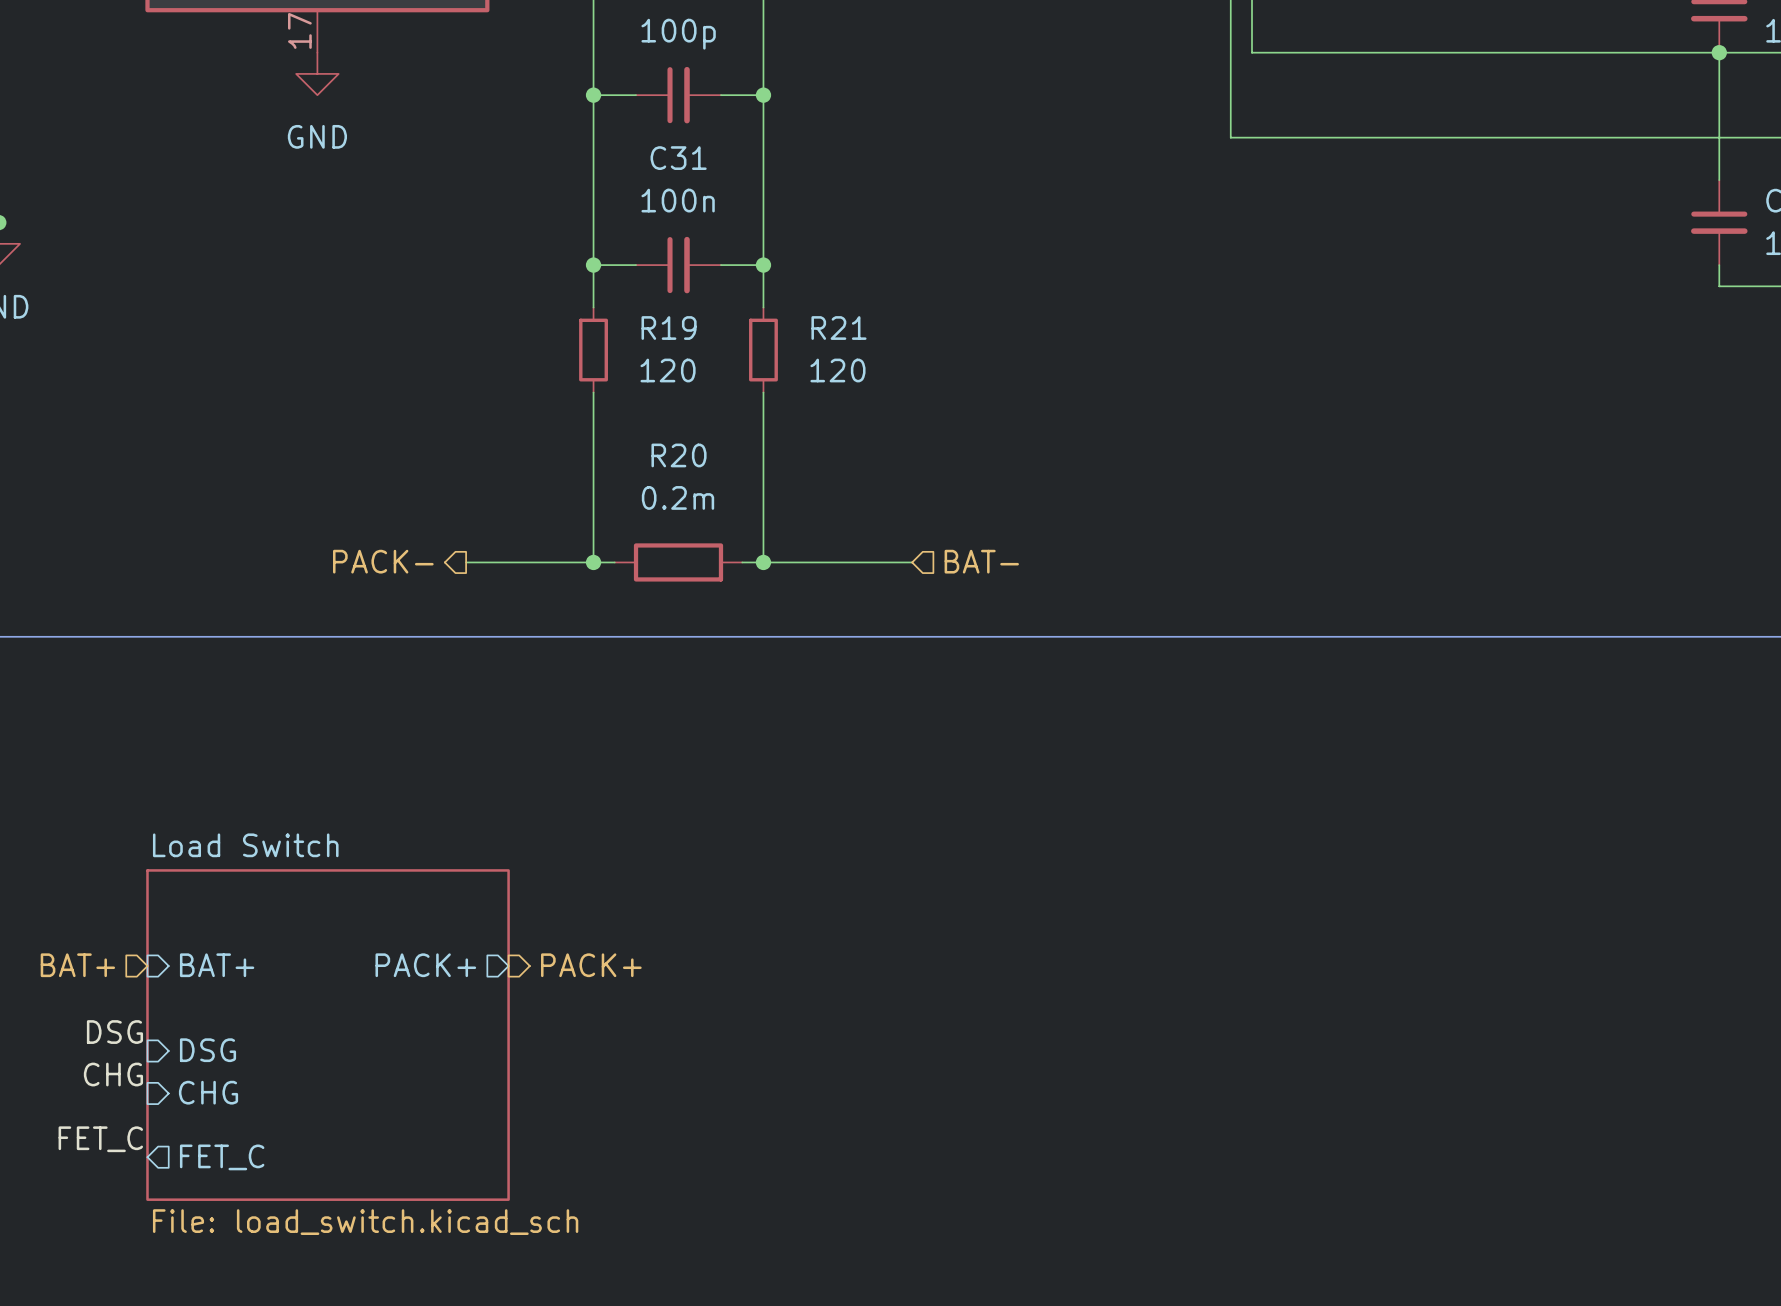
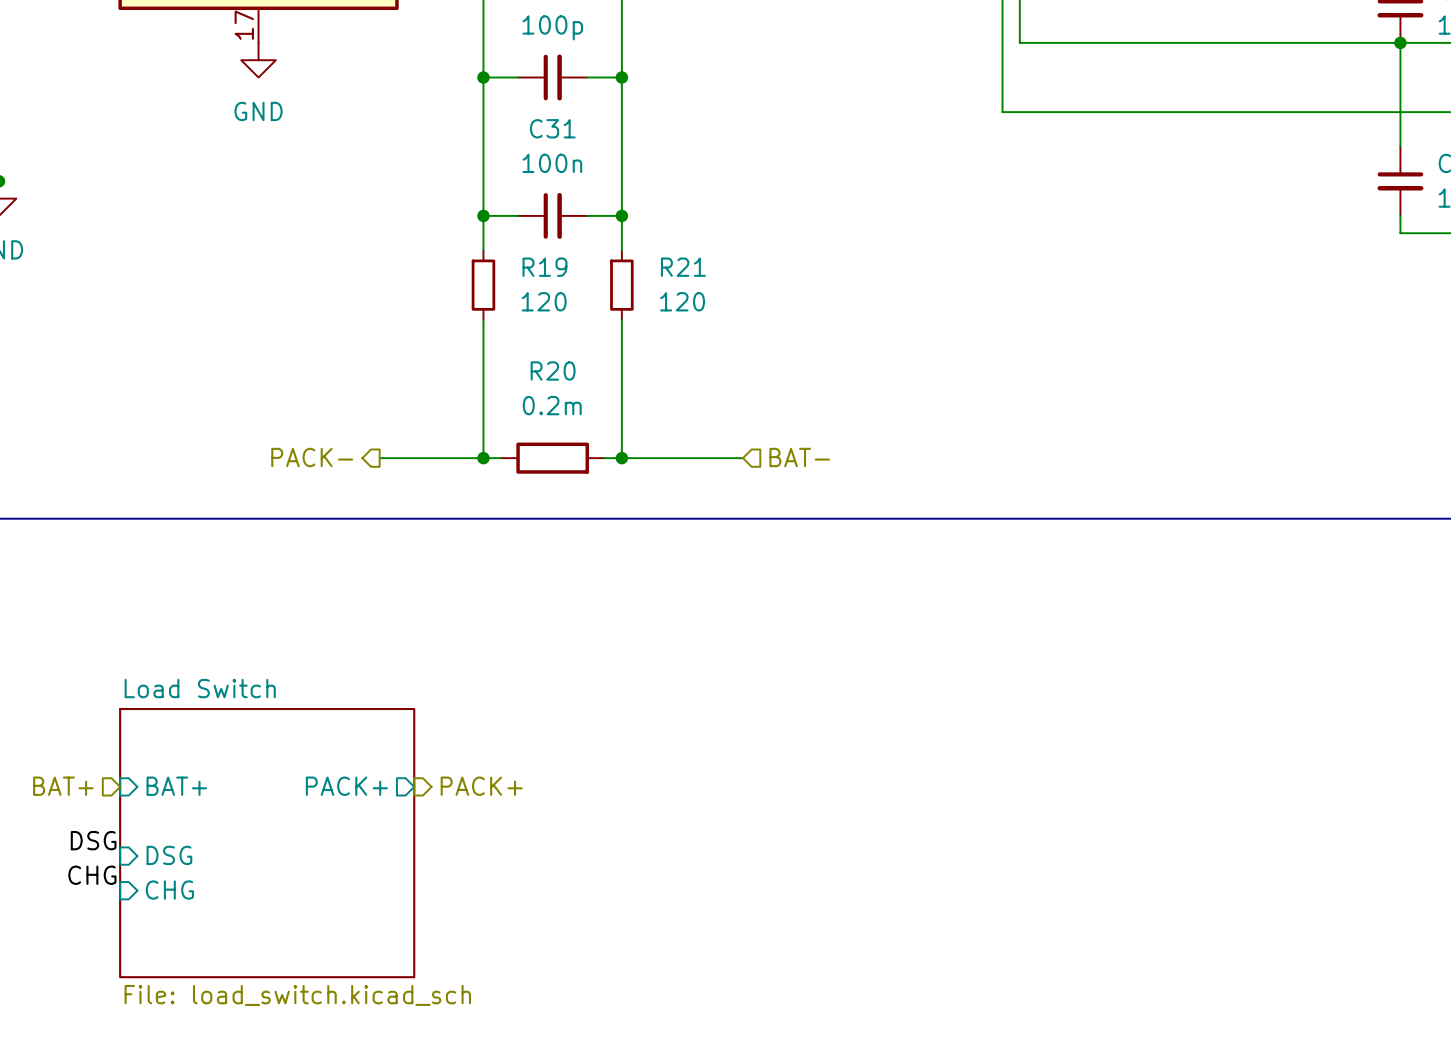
label: FET_C (100, 1139) -> none
sheet pin: FET_C (222, 1157) -> none

